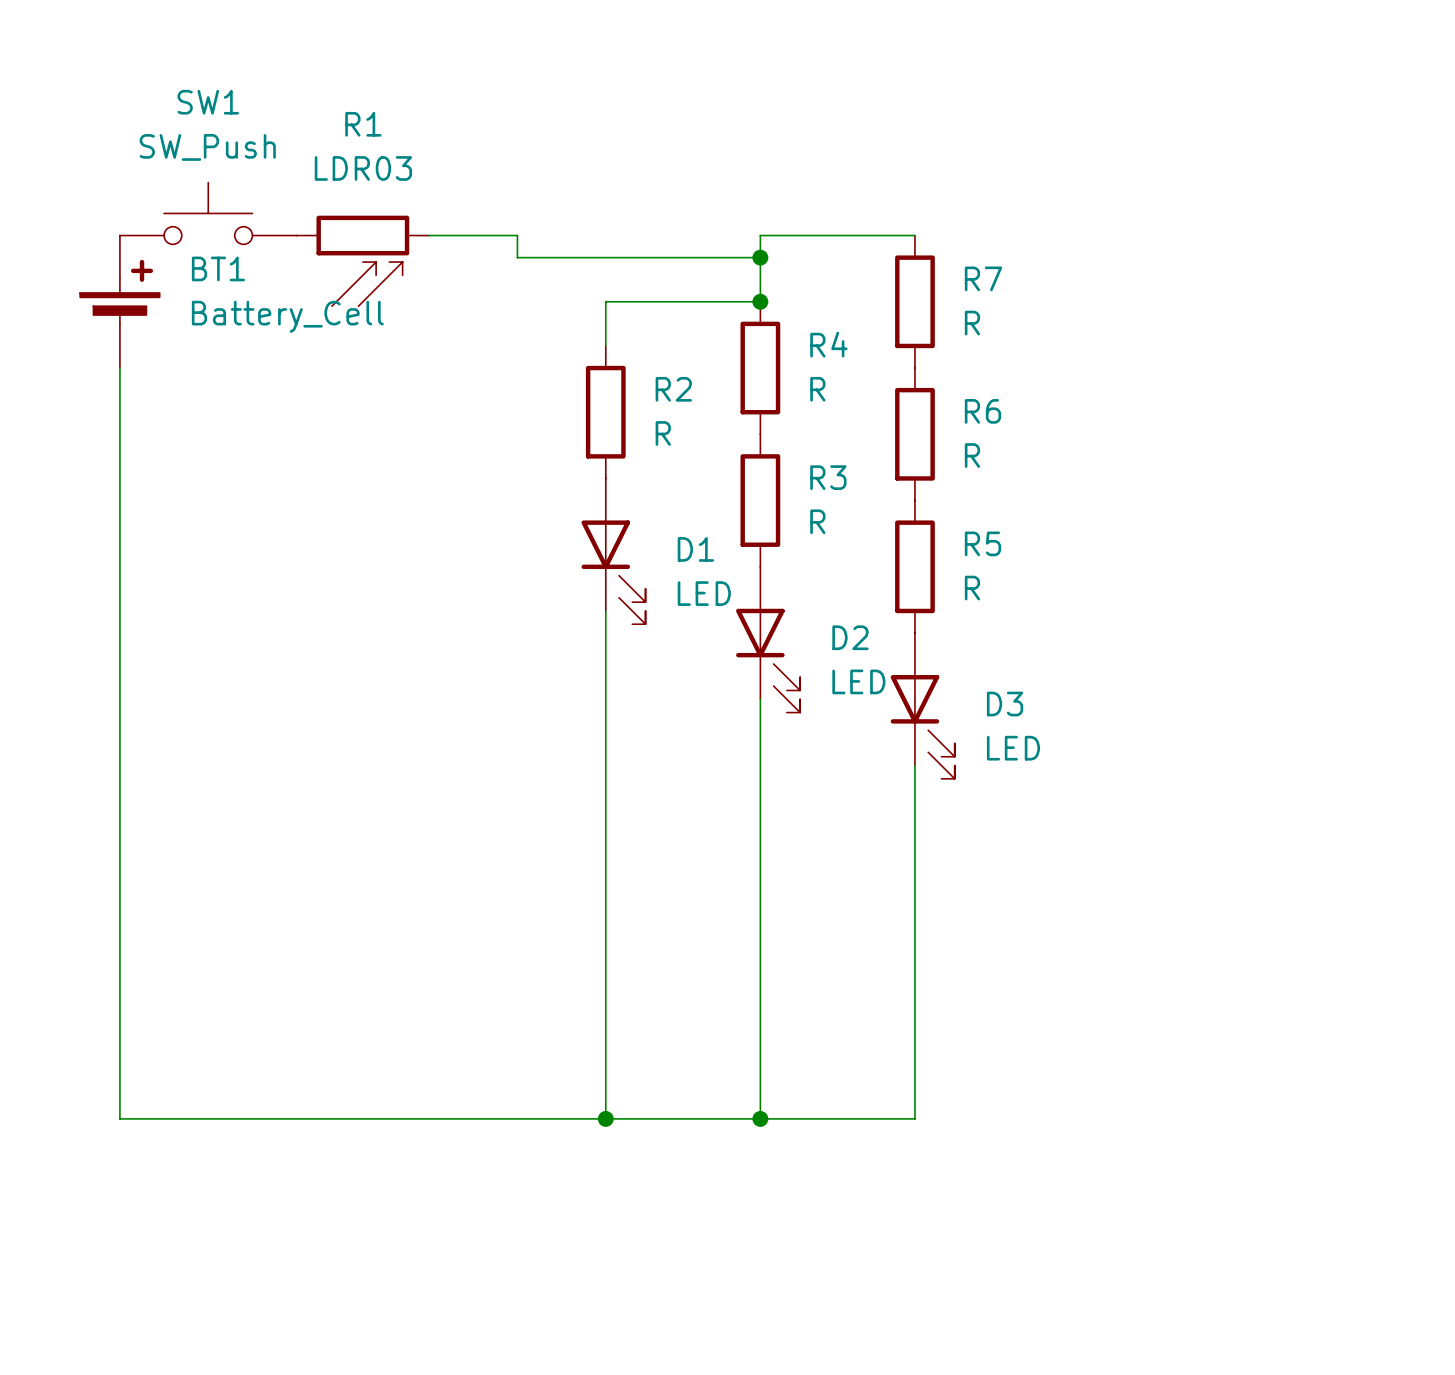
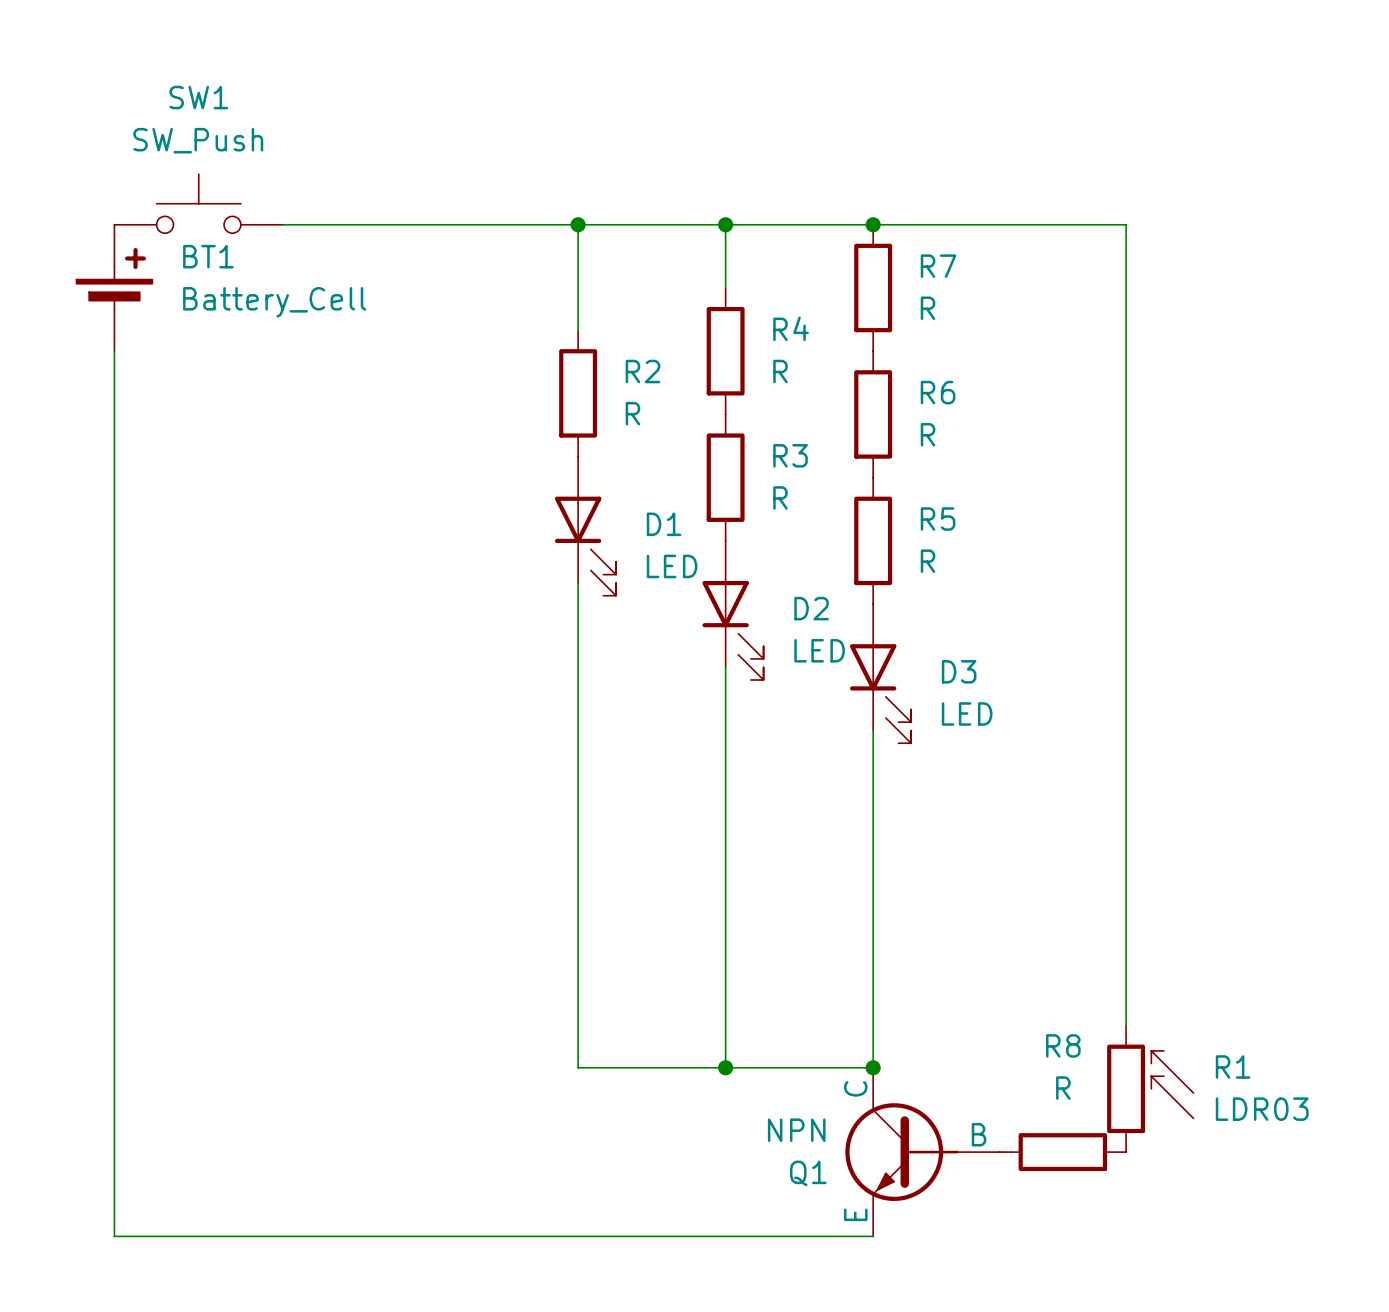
R1 name position: R1 (363, 124) -> R1 (1233, 1067)
R1 value position: LDR03 (363, 168) -> LDR03 (1262, 1109)
wire: none -> (283, 224) (409, 224)
wire: (517, 235) (517, 257) (760, 257) -> (493, 224) (725, 224)
junction: none -> (578, 224)
wire: none -> (873, 224) (1126, 224) (1126, 1025)
junction: none -> (873, 224)
junction position: (760, 257) -> (725, 224)
R1 rotation: 0° (362, 260) -> 90° counterclockwise (1150, 1088)
R1 position: (362, 260) -> (1150, 1088)
wire: (605, 301) (760, 301) -> (578, 288) (578, 224)
junction: (760, 301) -> none
wire: (119, 1118) (605, 1118) -> (114, 1067) (114, 1236) (873, 1236)
junction: (605, 1118) -> none
junction: none -> (873, 1067)
Q1: none -> NPN (922, 1152)
R8: none -> R (1062, 1152)

